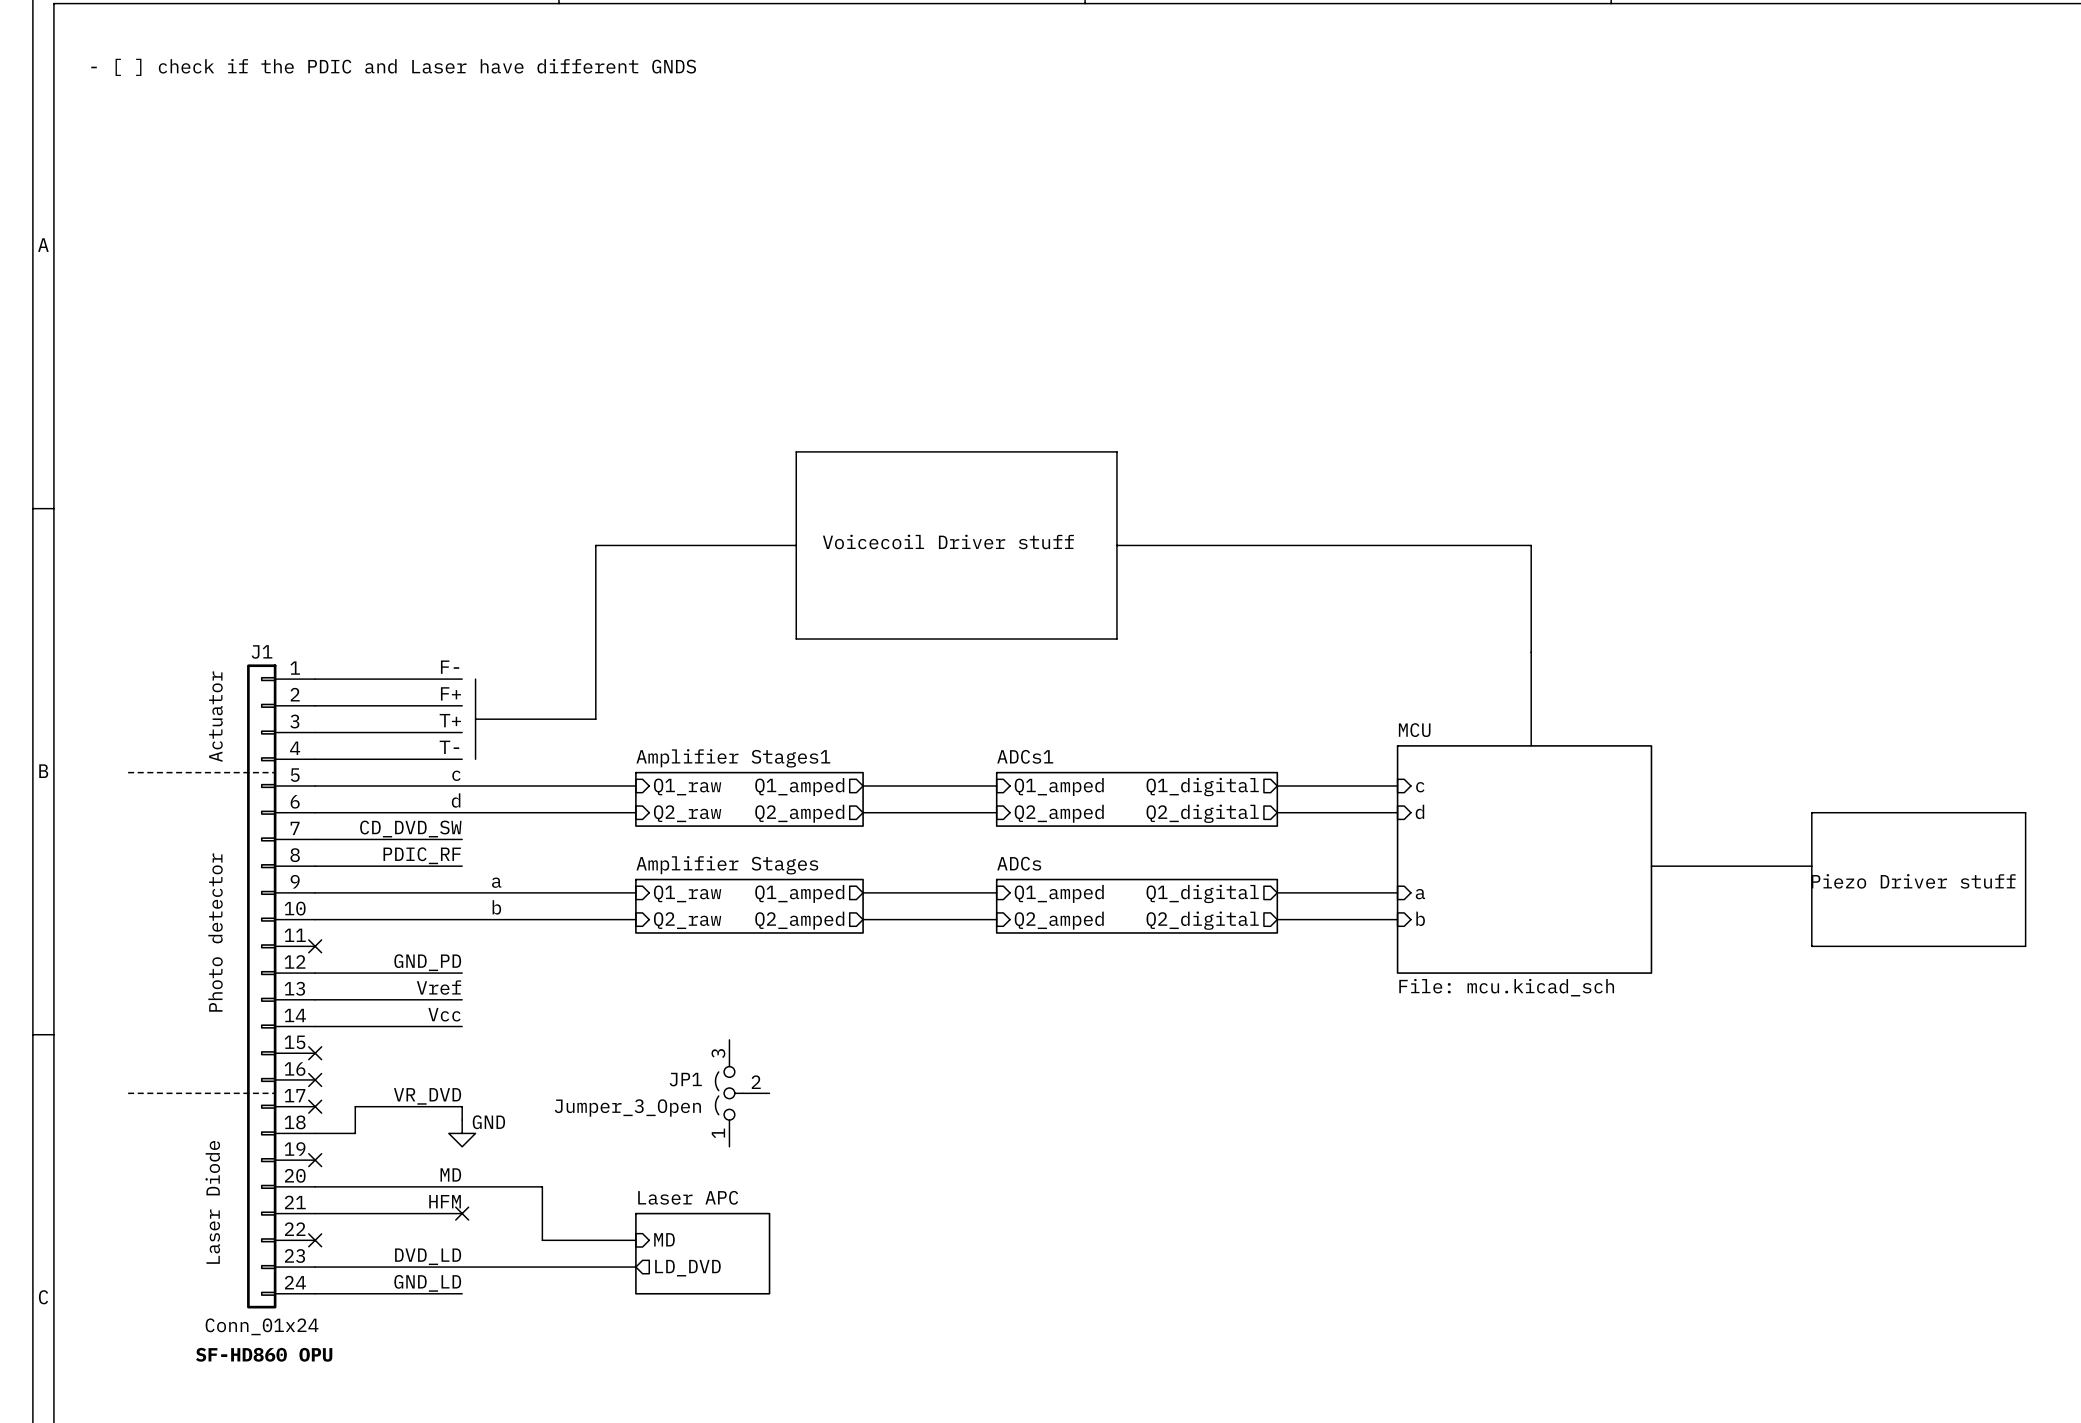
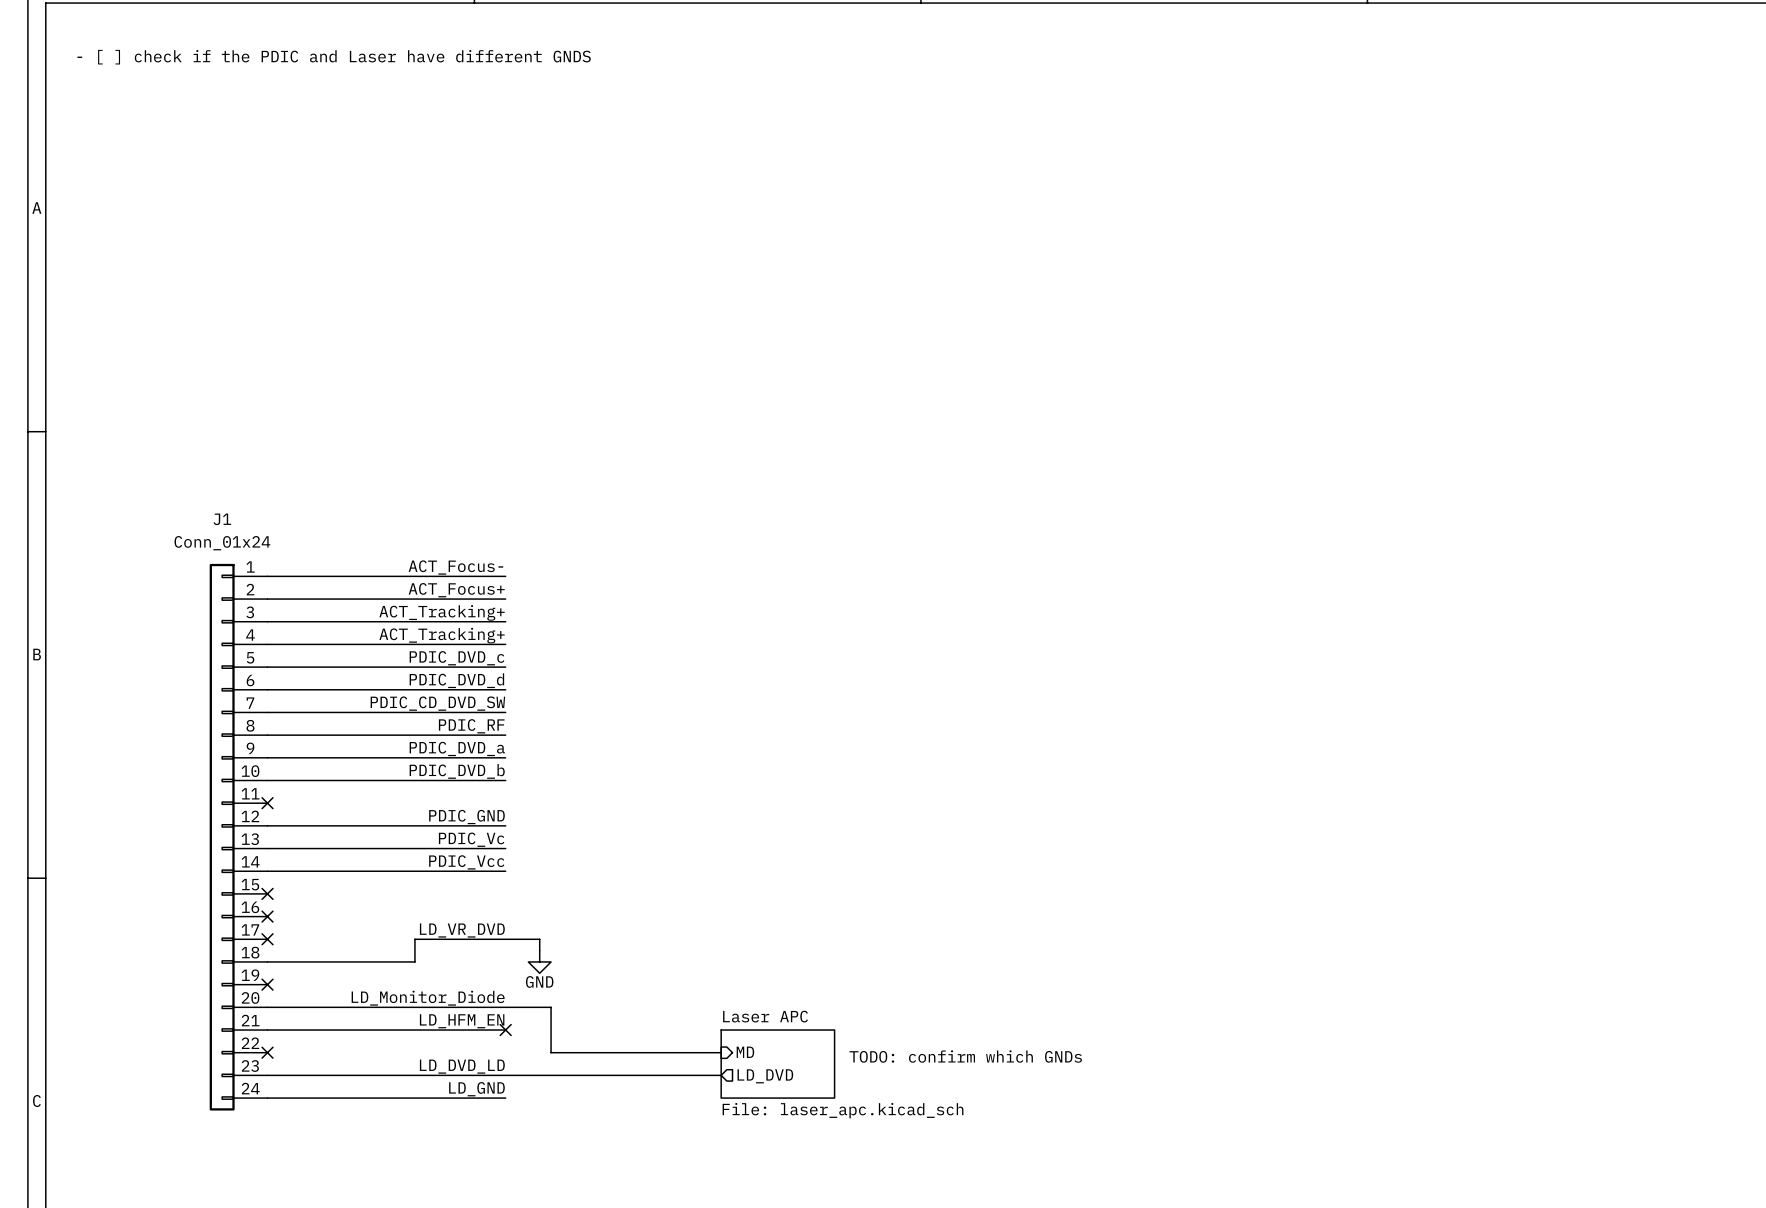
line: (796, 451) (1116, 451) (1116, 639) (796, 639) (796, 451) -> none
text: Voicecoil Driver stuff (948, 541) -> none
line: (796, 545) (595, 545) (595, 719) (475, 719) -> none
line: (1116, 545) (1531, 545) (1531, 745) -> none
J1 name position: J1 (262, 651) -> J1 (222, 519)
label: F- (450, 667) -> none
label: none -> ACT_Focus- (455, 567)
wire: none -> (392, 576) (505, 576)
line: (475, 679) (475, 759) -> none
label: F+ (450, 693) -> none
label: none -> ACT_Focus+ (456, 590)
wire: none -> (392, 599) (505, 599)
text: Actuator (215, 716) -> none
label: T+ (450, 720) -> none
label: none -> ACT_Tracking+ (442, 612)
wire: none -> (392, 621) (505, 621)
label: T- (449, 747) -> none
label: none -> ACT_Tracking+ (442, 635)
wire: none -> (392, 644) (505, 644)
line: (128, 772) (275, 772) -> none
label: c (456, 775) -> none
label: none -> PDIC_DVD_c (456, 658)
wire: (595, 785) (635, 785) -> none
wire: (863, 785) (996, 785) -> none
wire: (1277, 785) (1397, 785) -> none
sheet pin: Q1_raw (687, 786) -> none
sheet pin: Q1_amped (799, 787) -> none
sheet pin: Q1_amped (1059, 787) -> none
sheet pin: Q1_digital (1202, 787) -> none
sheet pin: c (1420, 787) -> none
sheet Amplifier Stages1: (749, 799) -> none
sheet ADCs1: (1137, 799) -> none
label: d (456, 800) -> none
label: none -> PDIC_DVD_d (456, 680)
sheet pin: d (1419, 811) -> none
wire: (595, 812) (635, 812) -> none
wire: (863, 812) (996, 812) -> none
wire: (1277, 812) (1397, 812) -> none
line: (1811, 812) (2025, 812) (2025, 946) (1811, 946) (1811, 812) -> none
sheet pin: Q2_raw (687, 813) -> none
sheet pin: Q2_amped (799, 813) -> none
sheet pin: Q2_amped (1059, 813) -> none
sheet pin: Q2_digital (1202, 813) -> none
label: CD_DVD_SW (410, 829) -> none
label: none -> PDIC_CD_DVD_SW (437, 703)
wire: none -> (392, 712) (505, 712)
label position: PDIC_RF (422, 855) -> PDIC_RF (471, 726)
sheet MCU: File: mcu.kicad_sch (1524, 859) -> none
wire: none -> (392, 735) (505, 735)
line: (1651, 866) (1811, 866) -> none
text: Piezo Driver stuff (1913, 881) -> none
label: a (496, 882) -> none
label: none -> PDIC_DVD_a (457, 748)
wire: (595, 892) (635, 892) -> none
wire: (863, 892) (996, 892) -> none
wire: (1277, 892) (1397, 892) -> none
sheet pin: Q1_raw (687, 893) -> none
sheet pin: Q1_amped (799, 893) -> none
sheet pin: Q1_amped (1059, 893) -> none
sheet pin: Q1_digital (1202, 893) -> none
sheet pin: a (1420, 894) -> none
sheet Amplifier Stages: (749, 906) -> none
sheet ADCs: (1137, 906) -> none
label: b (496, 907) -> none
label: none -> PDIC_DVD_b (457, 771)
sheet pin: b (1420, 918) -> none
wire: (595, 919) (635, 919) -> none
wire: (863, 919) (996, 919) -> none
wire: (1277, 919) (1397, 919) -> none
sheet pin: Q2_raw (687, 920) -> none
sheet pin: Q2_amped (799, 920) -> none
sheet pin: Q2_amped (1059, 920) -> none
sheet pin: Q2_digital (1202, 920) -> none
text: Photo detector (215, 932) -> none
label: GND_PD (427, 962) -> none
label: none -> PDIC_GND (466, 817)
wire: none -> (392, 825) (505, 825)
label: Vref (439, 987) -> none
label: none -> PDIC_Vc (471, 839)
wire: none -> (392, 848) (505, 848)
label: Vcc (444, 1014) -> none
label: none -> PDIC_Vcc (466, 862)
wire: none -> (392, 871) (505, 871)
line: (128, 1093) (275, 1093) -> none
JP1: Jumper_3_Open (742, 1093) -> none
label: VR_DVD (427, 1096) -> none
label: none -> LD_VR_DVD (462, 930)
wire: (462, 1120) (462, 1106) (355, 1106) (355, 1133) -> (539, 950) (539, 939) (414, 939) (414, 961) (301, 961)
power symbol text position: GND (488, 1122) -> GND (539, 981)
power symbol position: GND (462, 1133) -> GND (539, 961)
label: MD (450, 1174) -> none
label: none -> LD_Monitor_Diode (428, 998)
wire: (542, 1186) (542, 1240) (635, 1240) -> (460, 1007) (551, 1007) (551, 1052) (721, 1052)
label: HFM (445, 1201) -> none
text: Laser Diode (212, 1202) -> none
label: none -> LD_HFM_EN (462, 1021)
wire: none -> (392, 1030) (505, 1030)
no-connect mark: (462, 1213) -> none
no-connect mark: none -> (505, 1030)
sheet pin position: MD (664, 1239) -> MD (745, 1052)
text: none -> TODO: confirm which GNDs (965, 1056)
sheet Laser APC: (702, 1253) -> none
sheet Laser APC: none -> File: laser_apc.kicad_sch (777, 1064)
label: DVD_LD (428, 1256) -> none
label: none -> LD_DVD_LD (462, 1066)
wire: none -> (539, 1075) (721, 1075)
sheet pin position: LD_DVD (687, 1268) -> LD_DVD (765, 1076)
label: GND_LD (427, 1283) -> none
label: none -> LD_GND (476, 1089)
wire: none -> (392, 1098) (505, 1098)
J1 value position: Conn_01x24 (262, 1326) -> Conn_01x24 (222, 543)
text: SF-HD860 OPU (264, 1354) -> none

